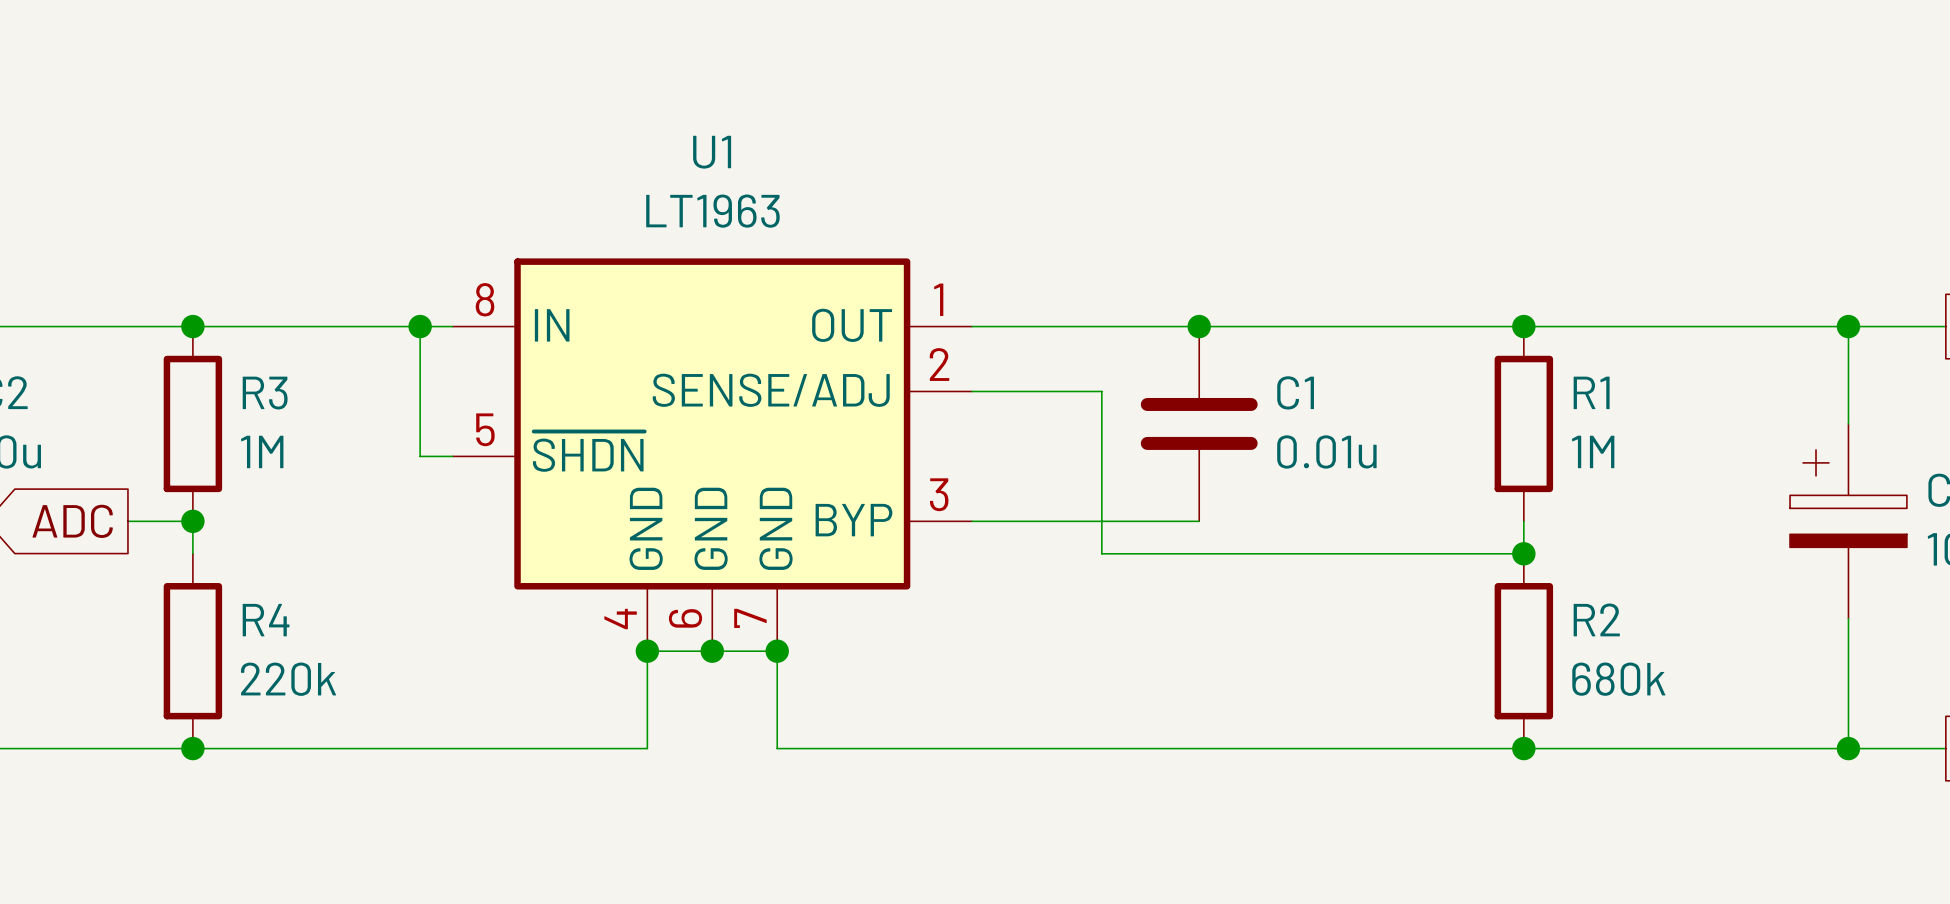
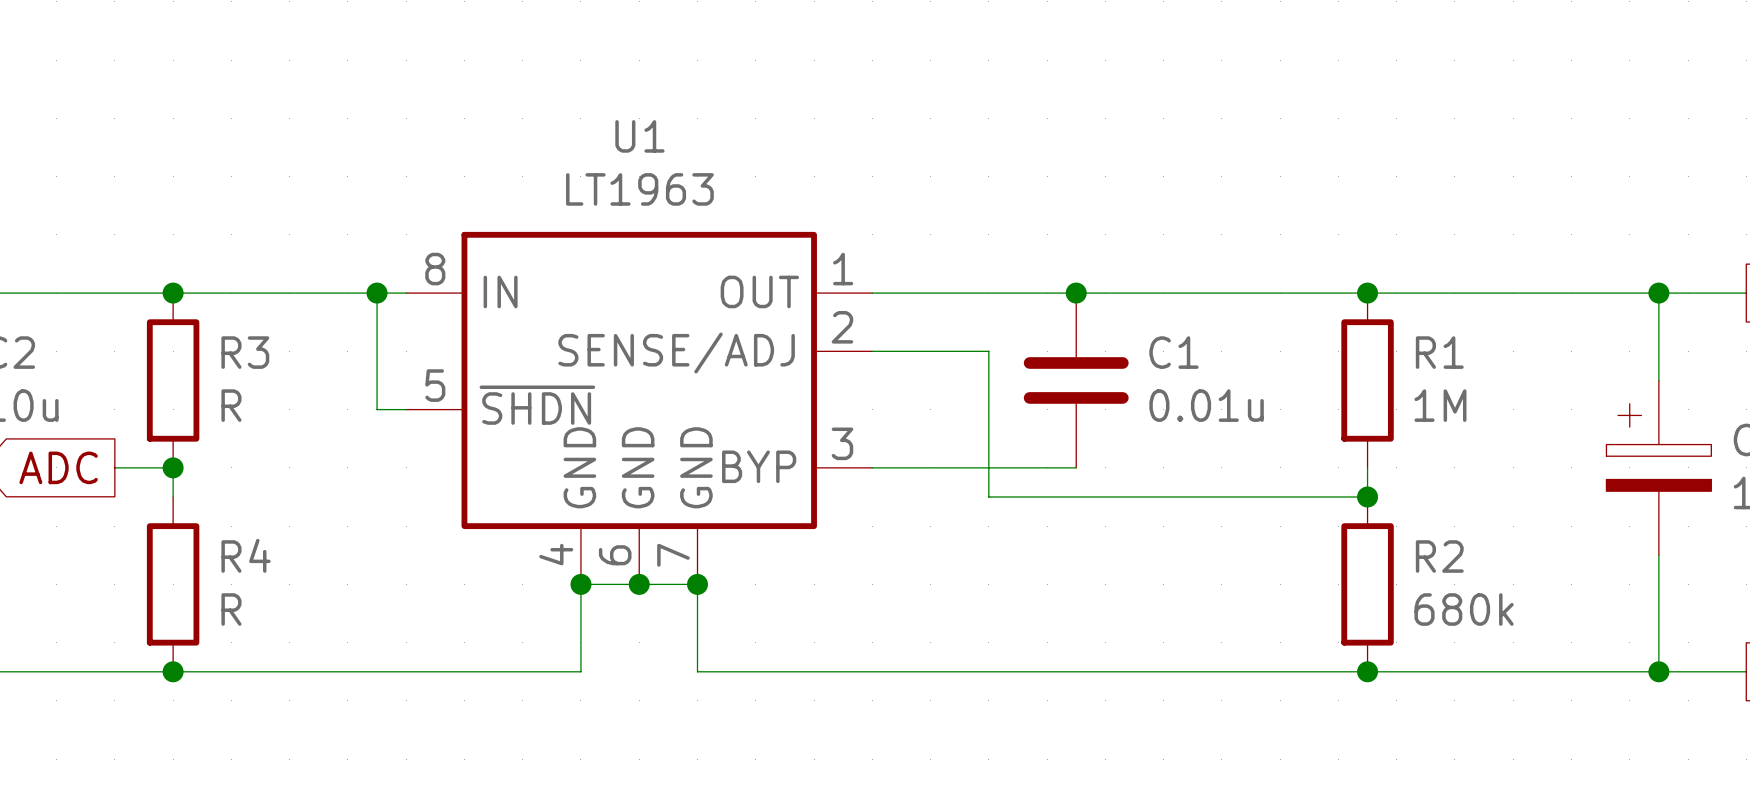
R3 value: 1M (262, 451) -> R (231, 405)
R4 value: 220k (288, 679) -> R (231, 609)

